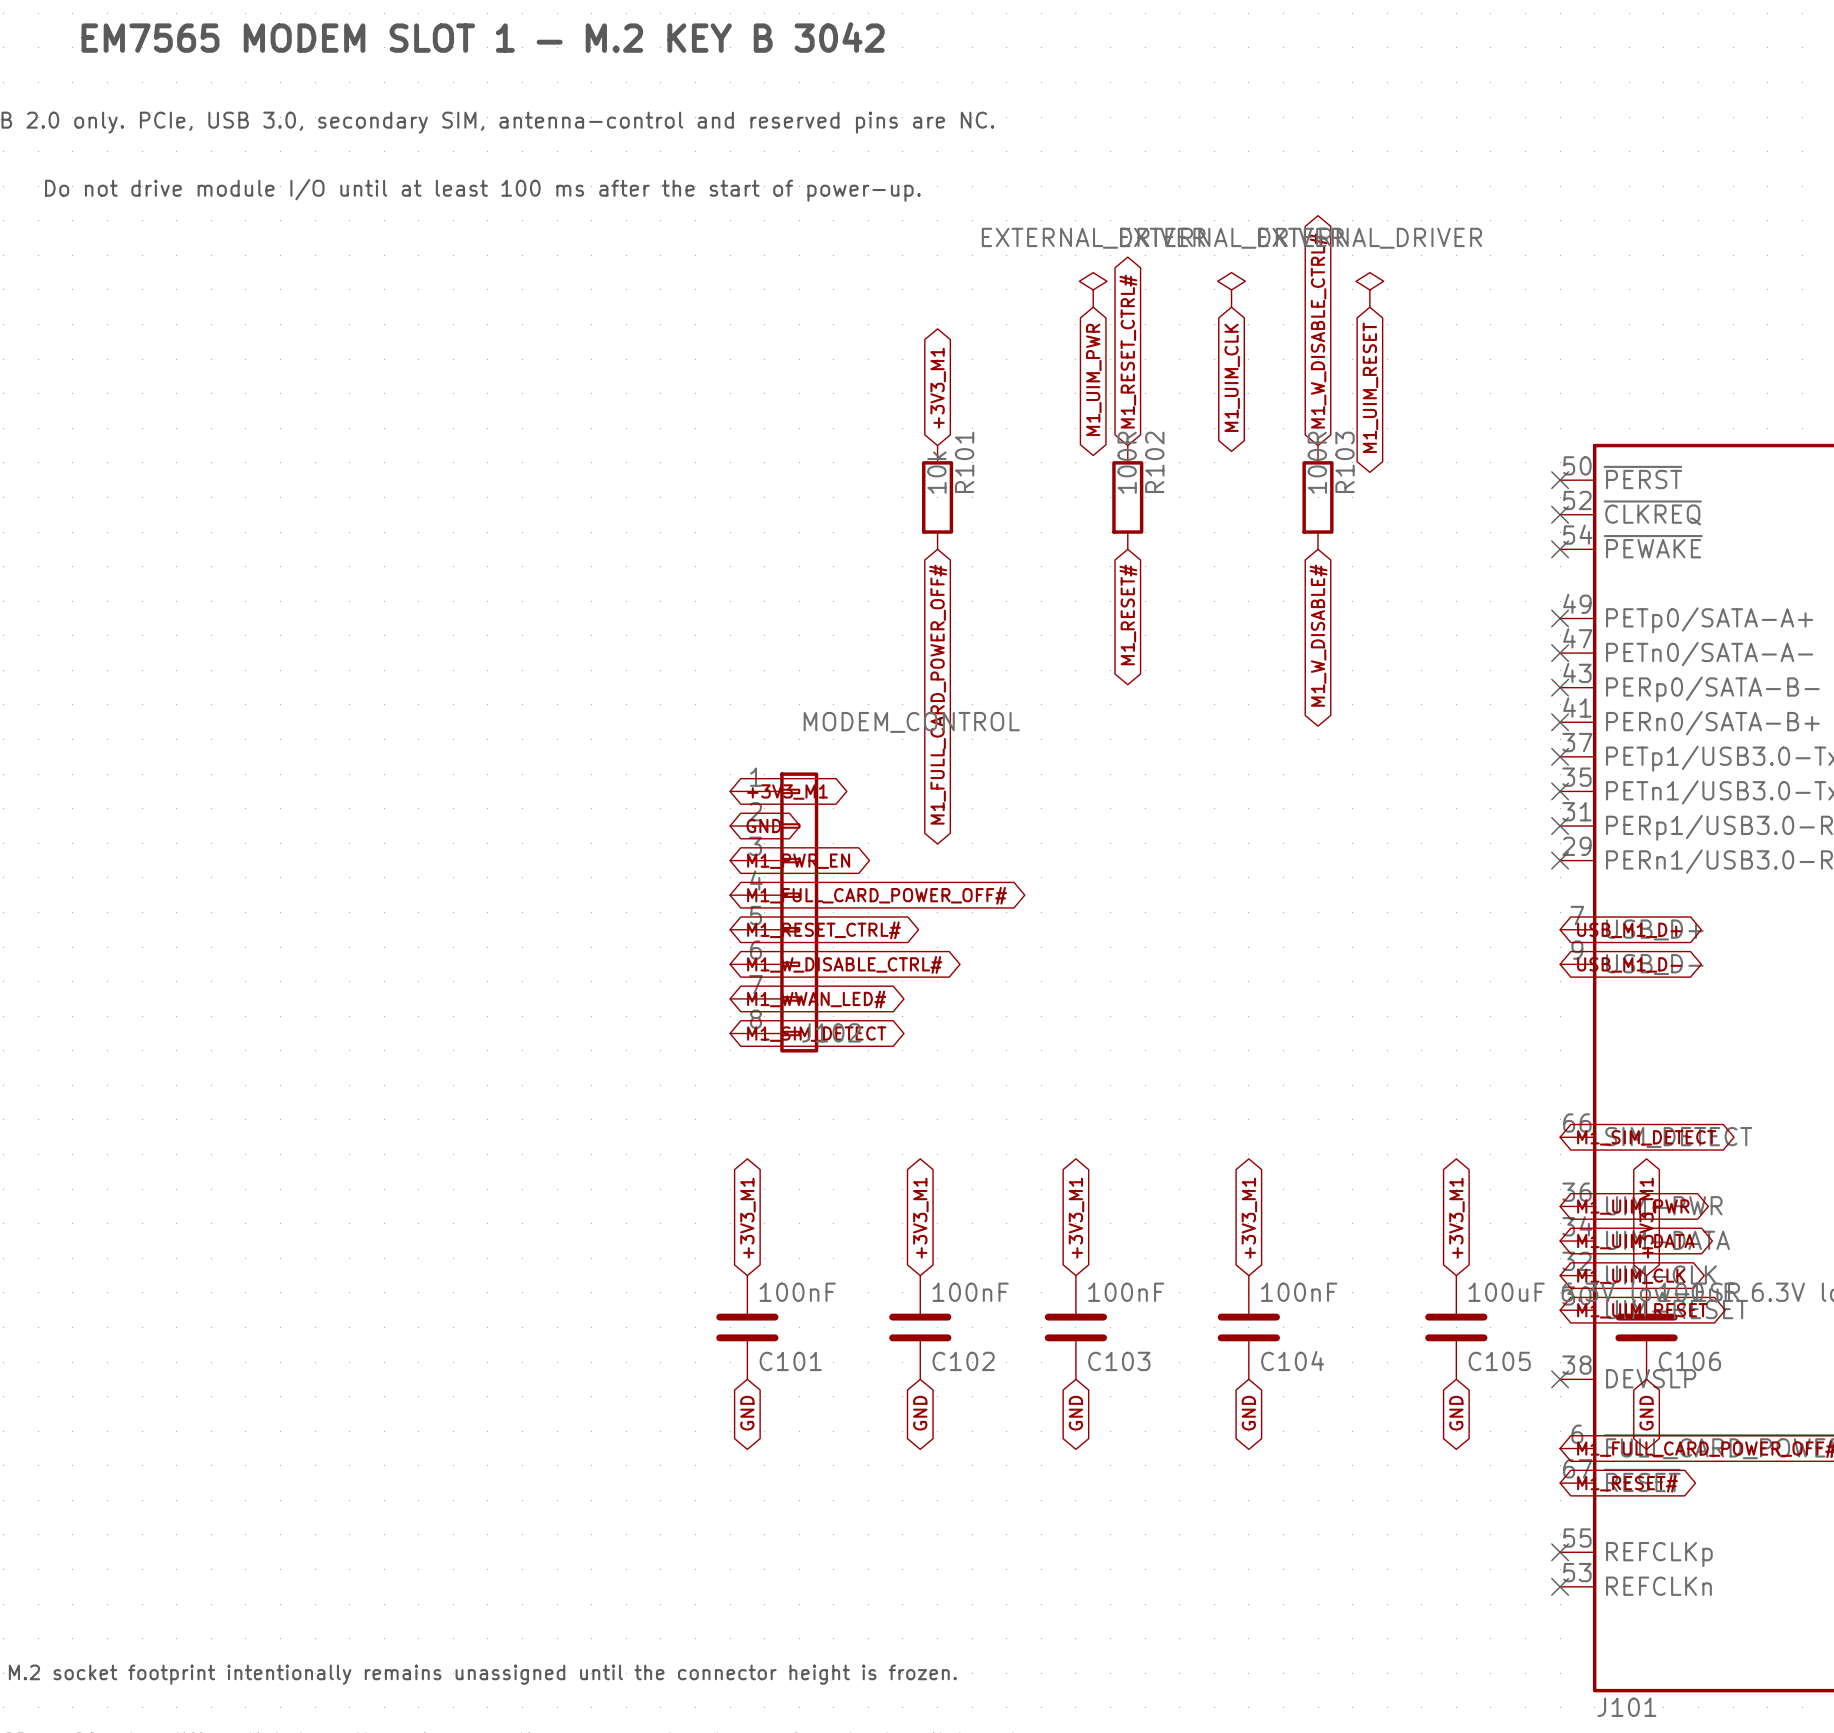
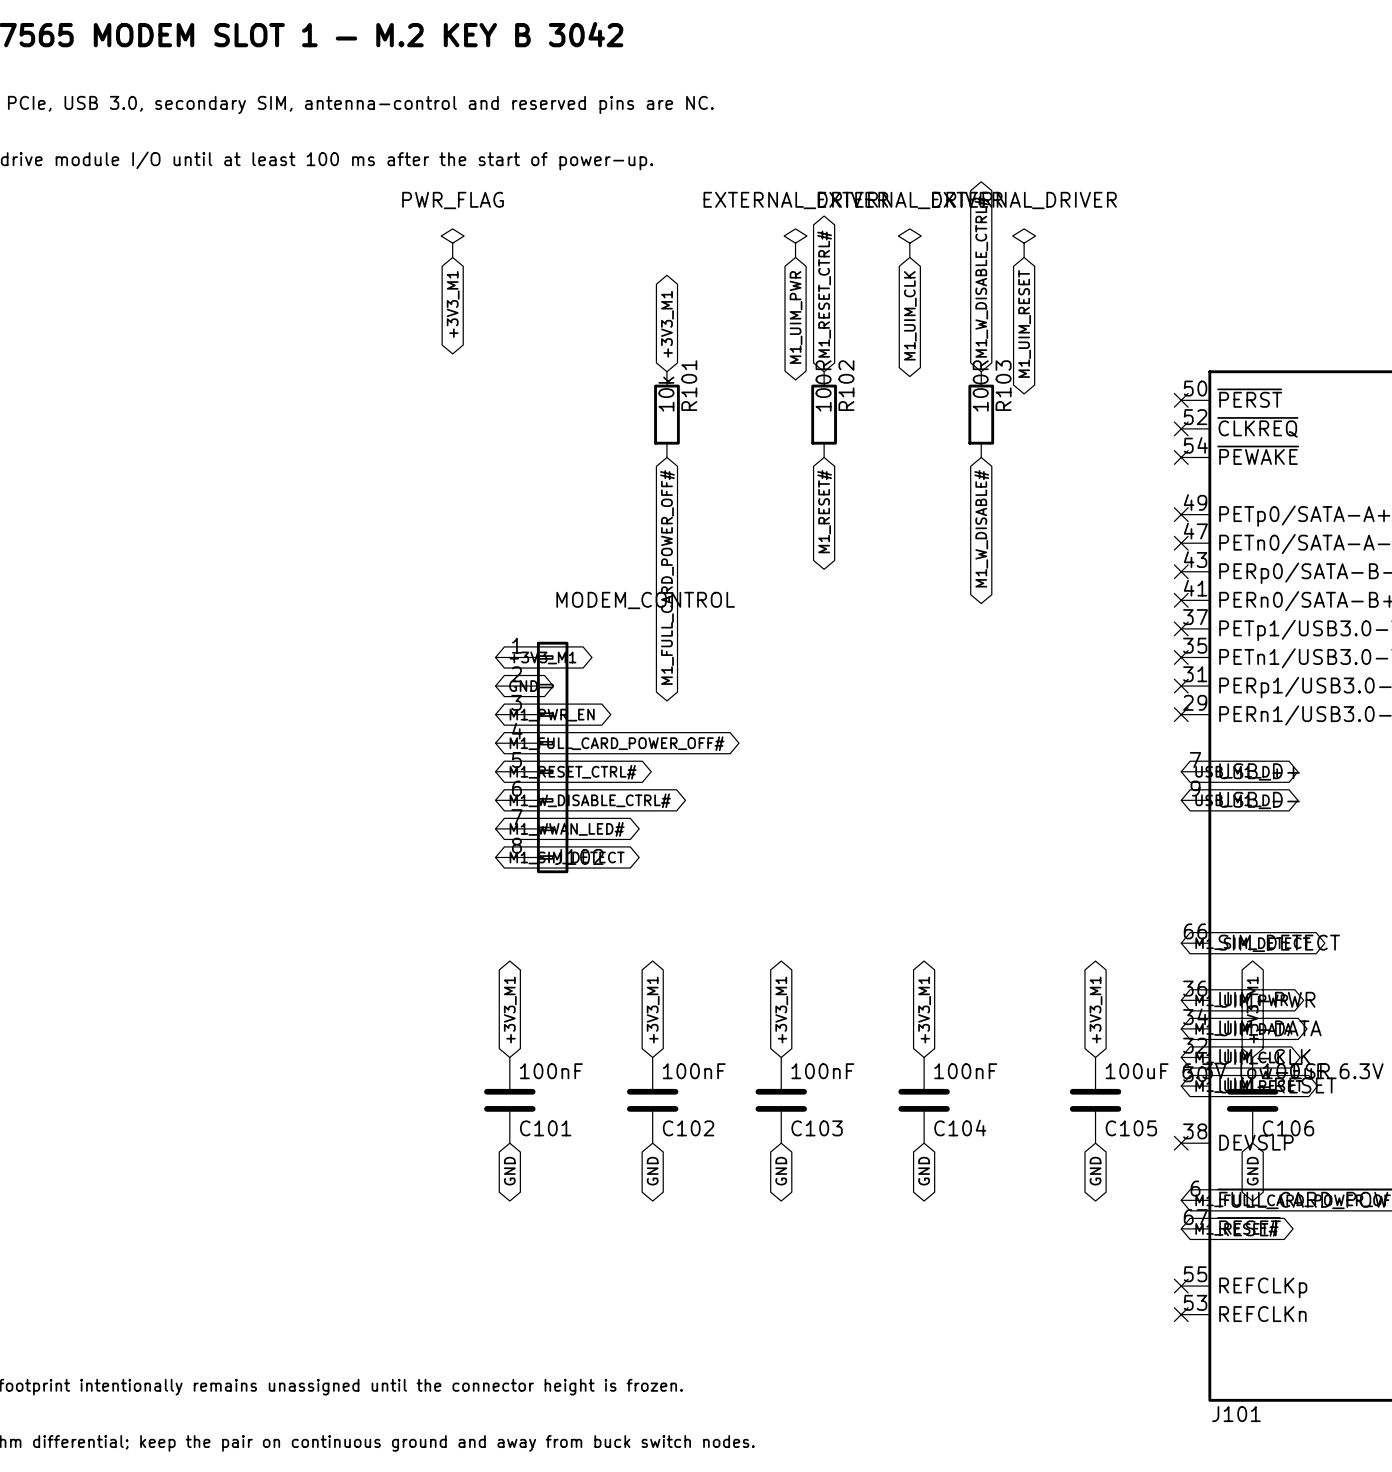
power symbol: none -> PWR_FLAG (452, 243)
global label: none -> +3V3_M1 (453, 304)

